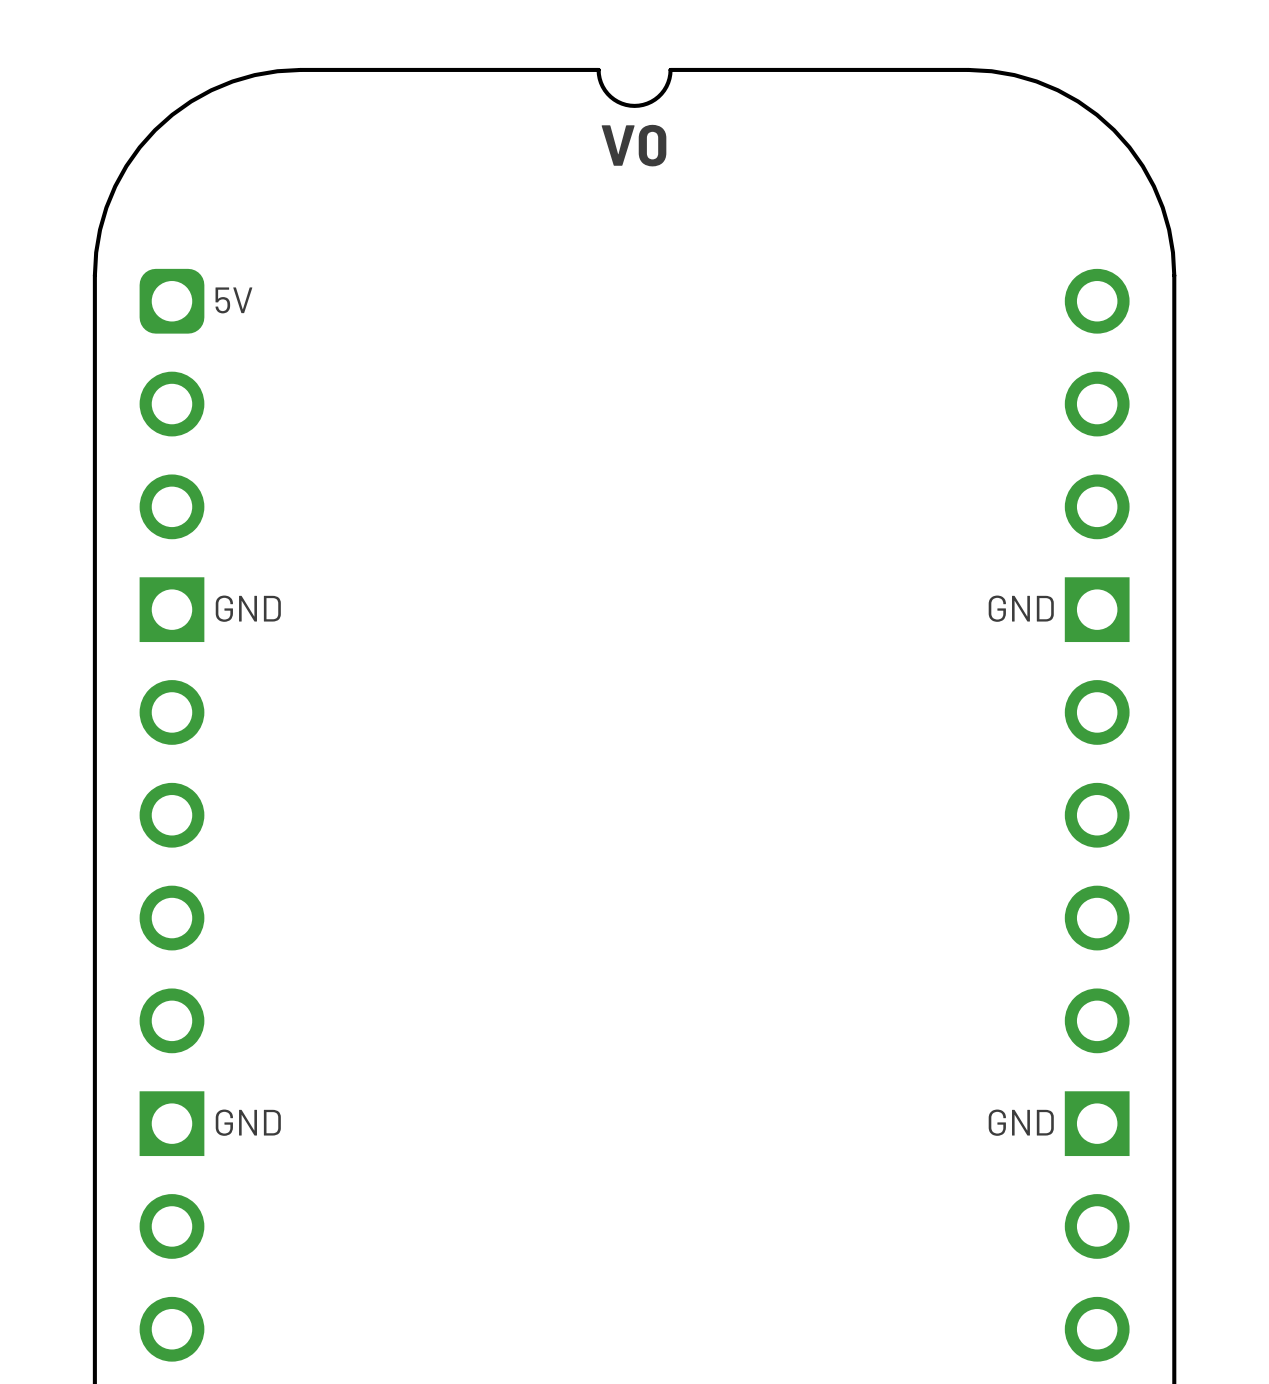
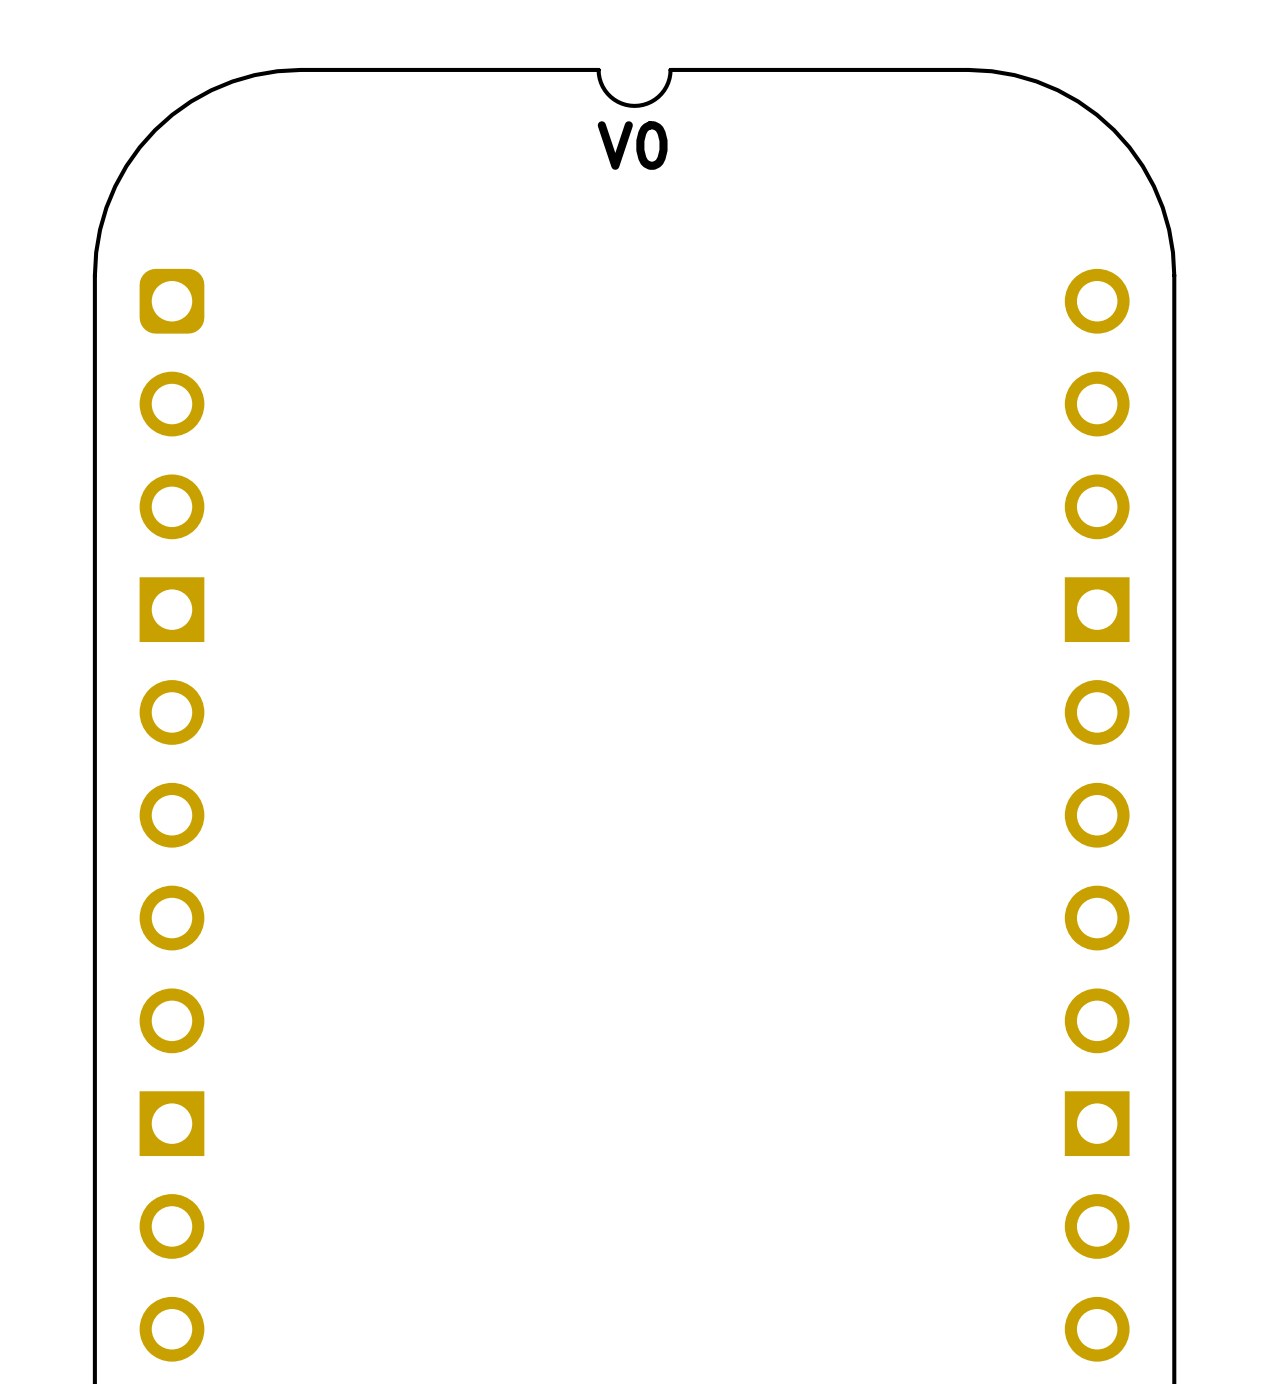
text: 5V (233, 300) -> none
text: GND (248, 608) -> none
text: GND (1021, 608) -> none
text: GND (248, 1122) -> none
text: GND (1021, 1122) -> none

